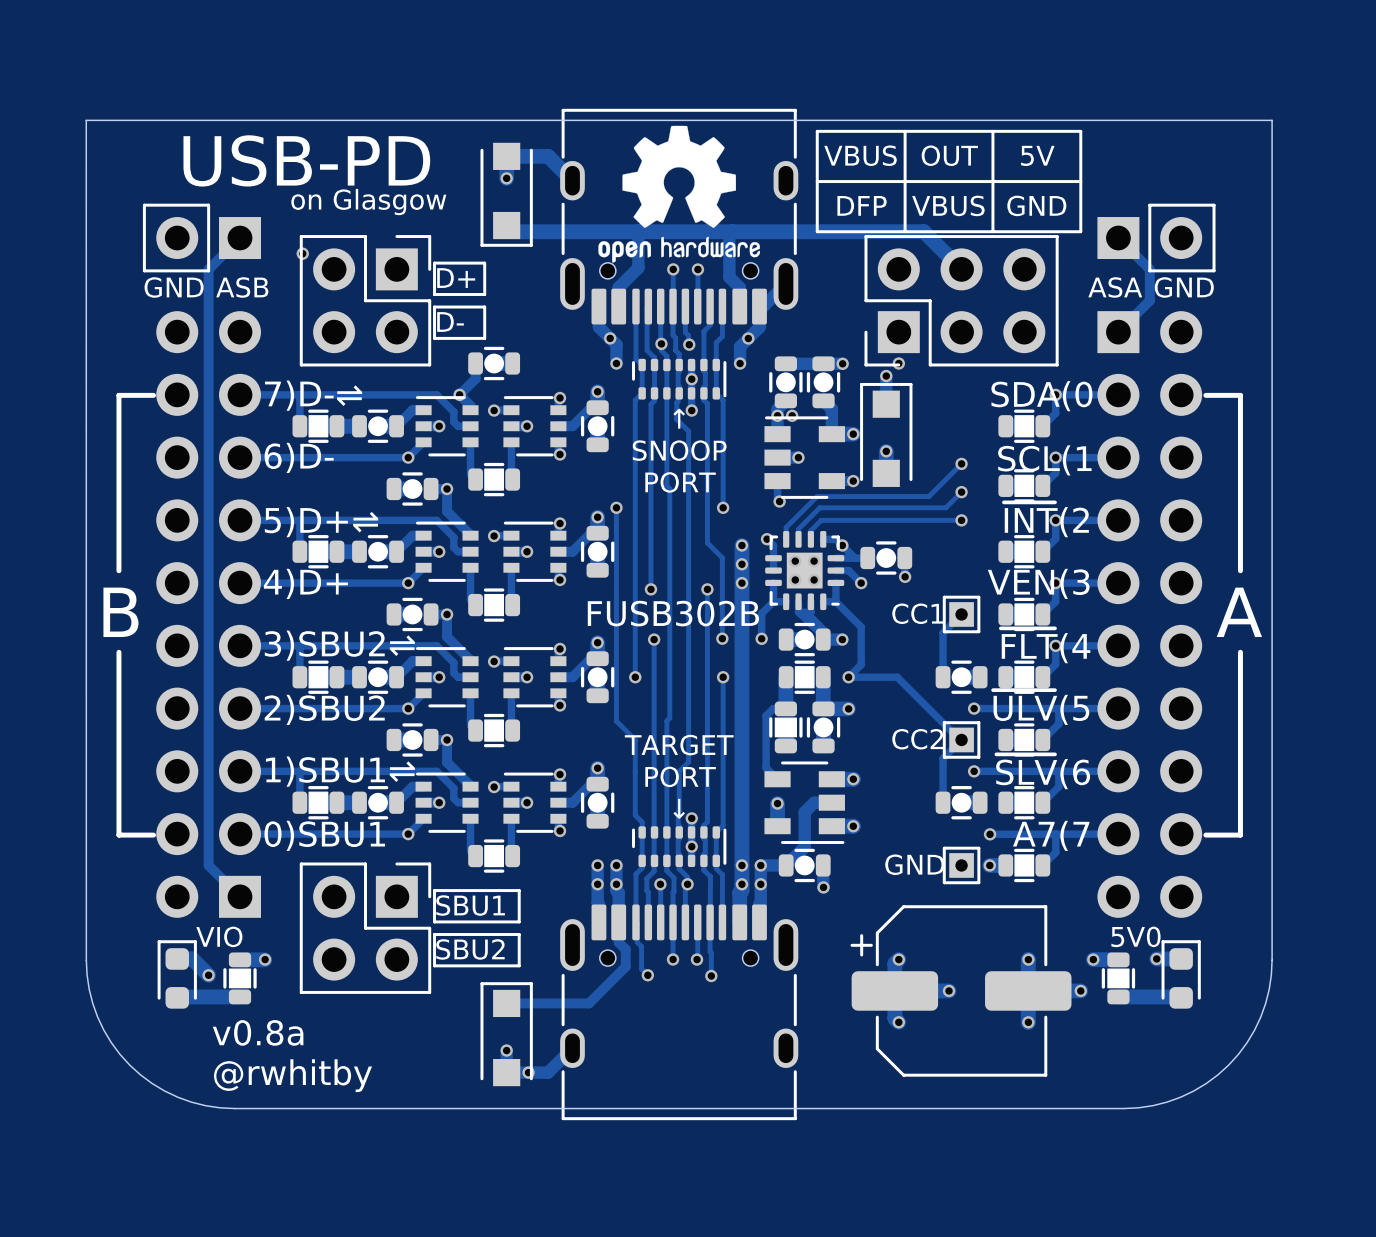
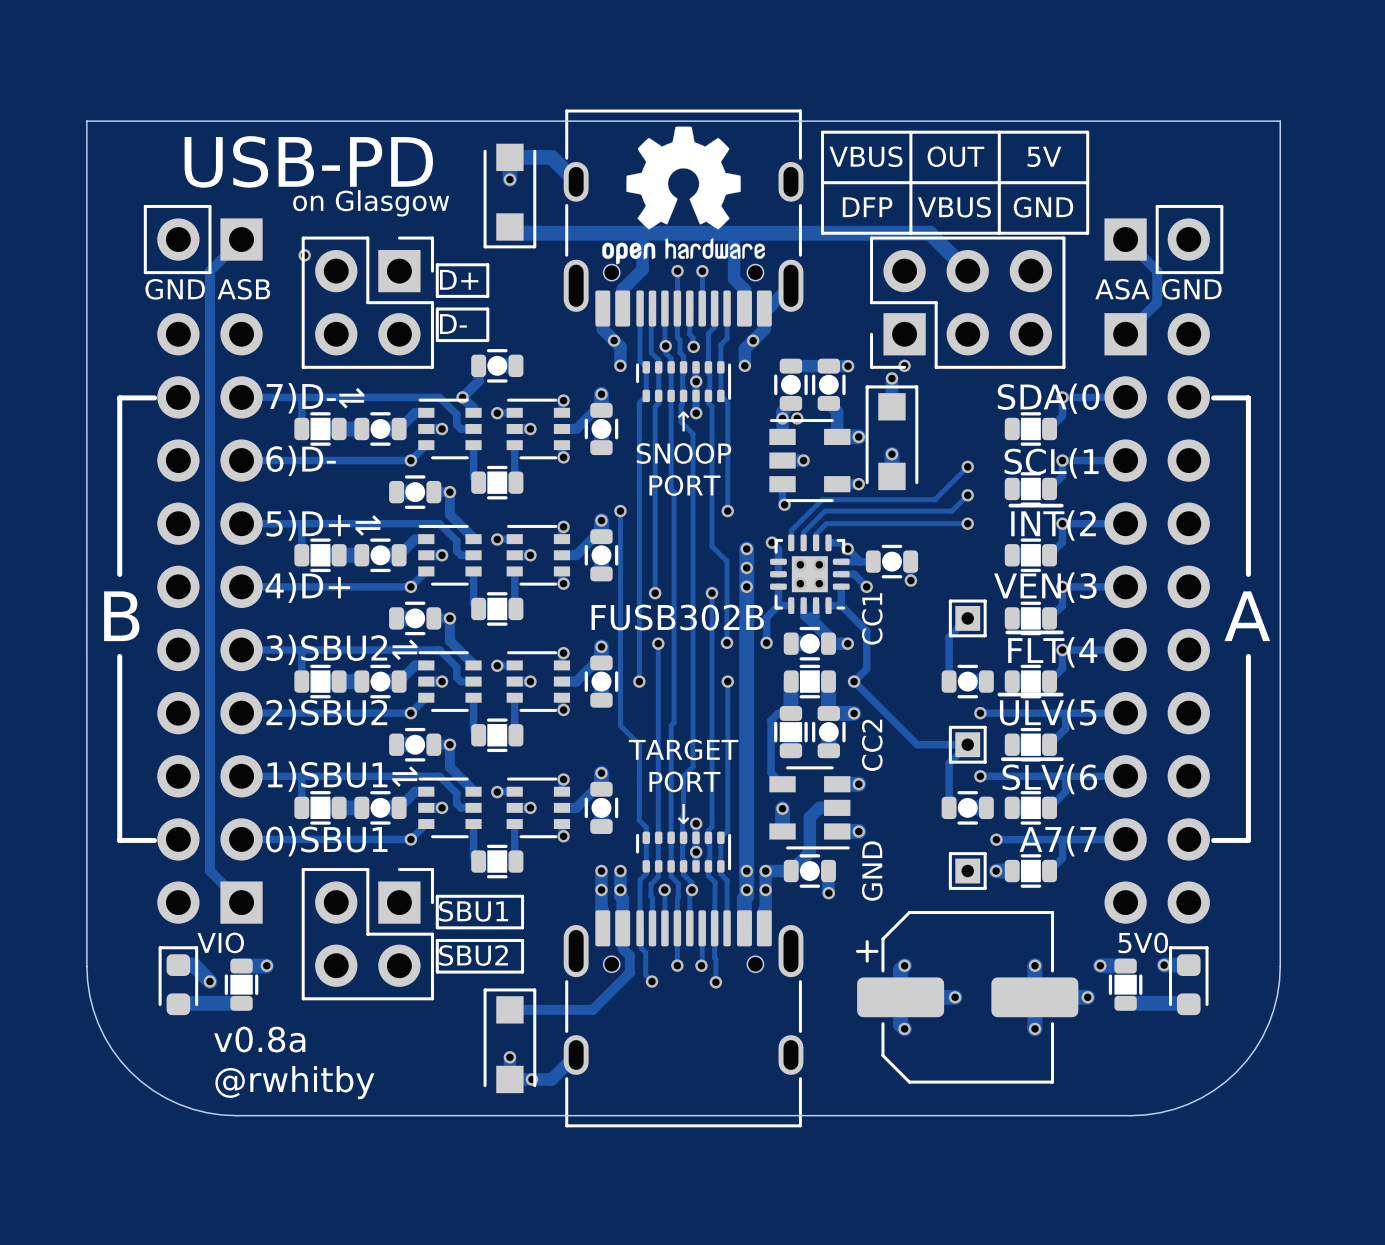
text rotation: 0° (917, 613) -> 90° counterclockwise (872, 618)
track: (848, 677) (897, 677) (960, 739) -> (854, 681) (917, 744) (966, 744)
text rotation: 0° (917, 739) -> 90° counterclockwise (872, 745)
text rotation: 0° (914, 864) -> 90° counterclockwise (872, 871)

